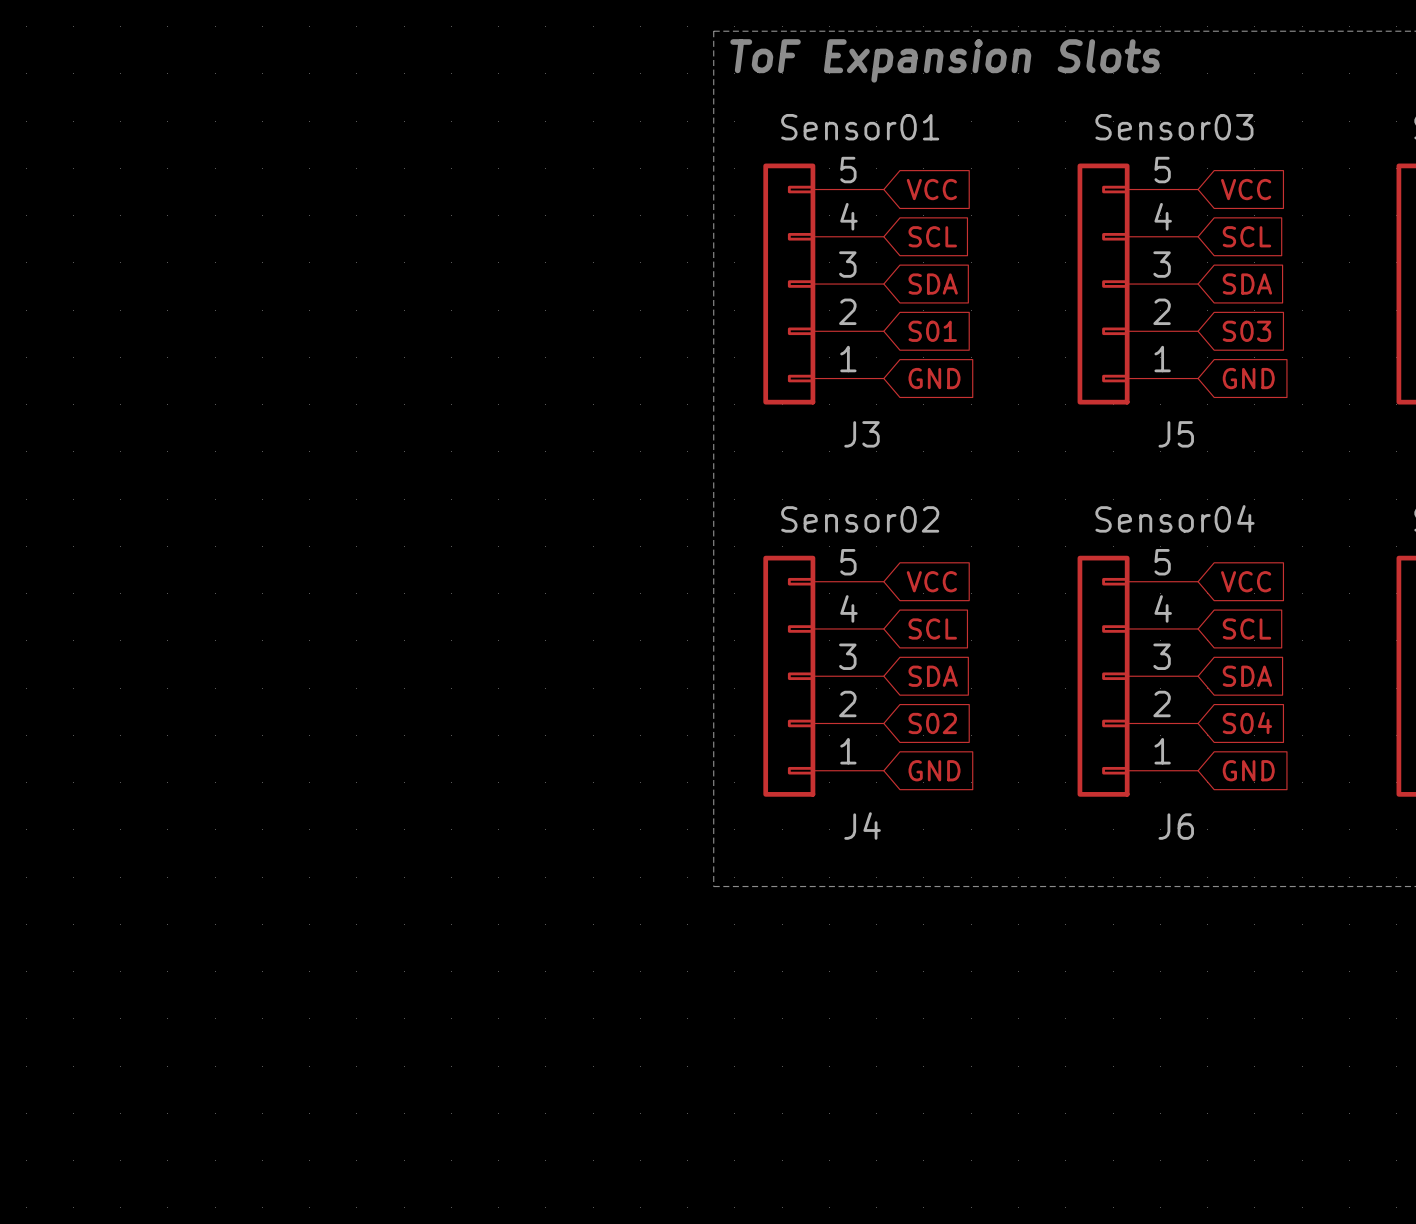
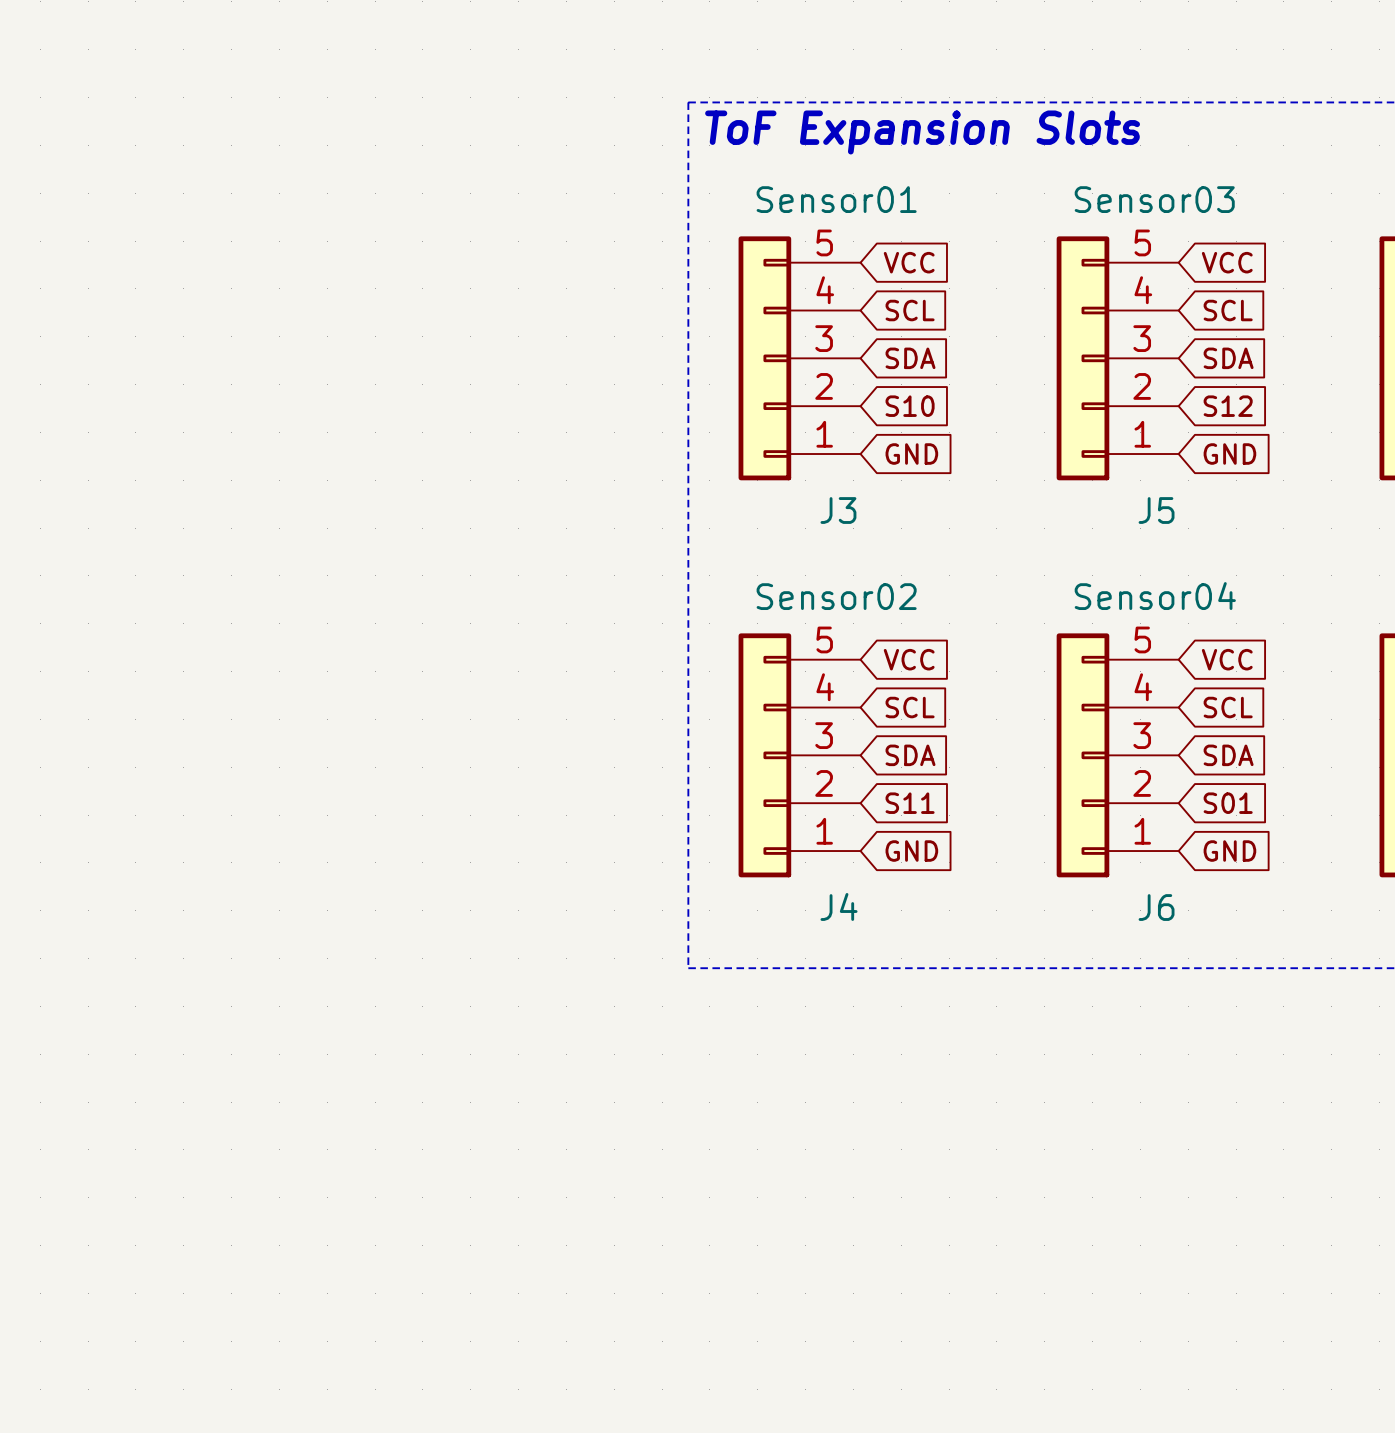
global label: S01 (932, 331) -> S10 (910, 406)
global label: S03 (1246, 331) -> S12 (1228, 406)
global label: S02 (932, 723) -> S11 (910, 803)
global label: S04 (1247, 723) -> S01 (1228, 803)

